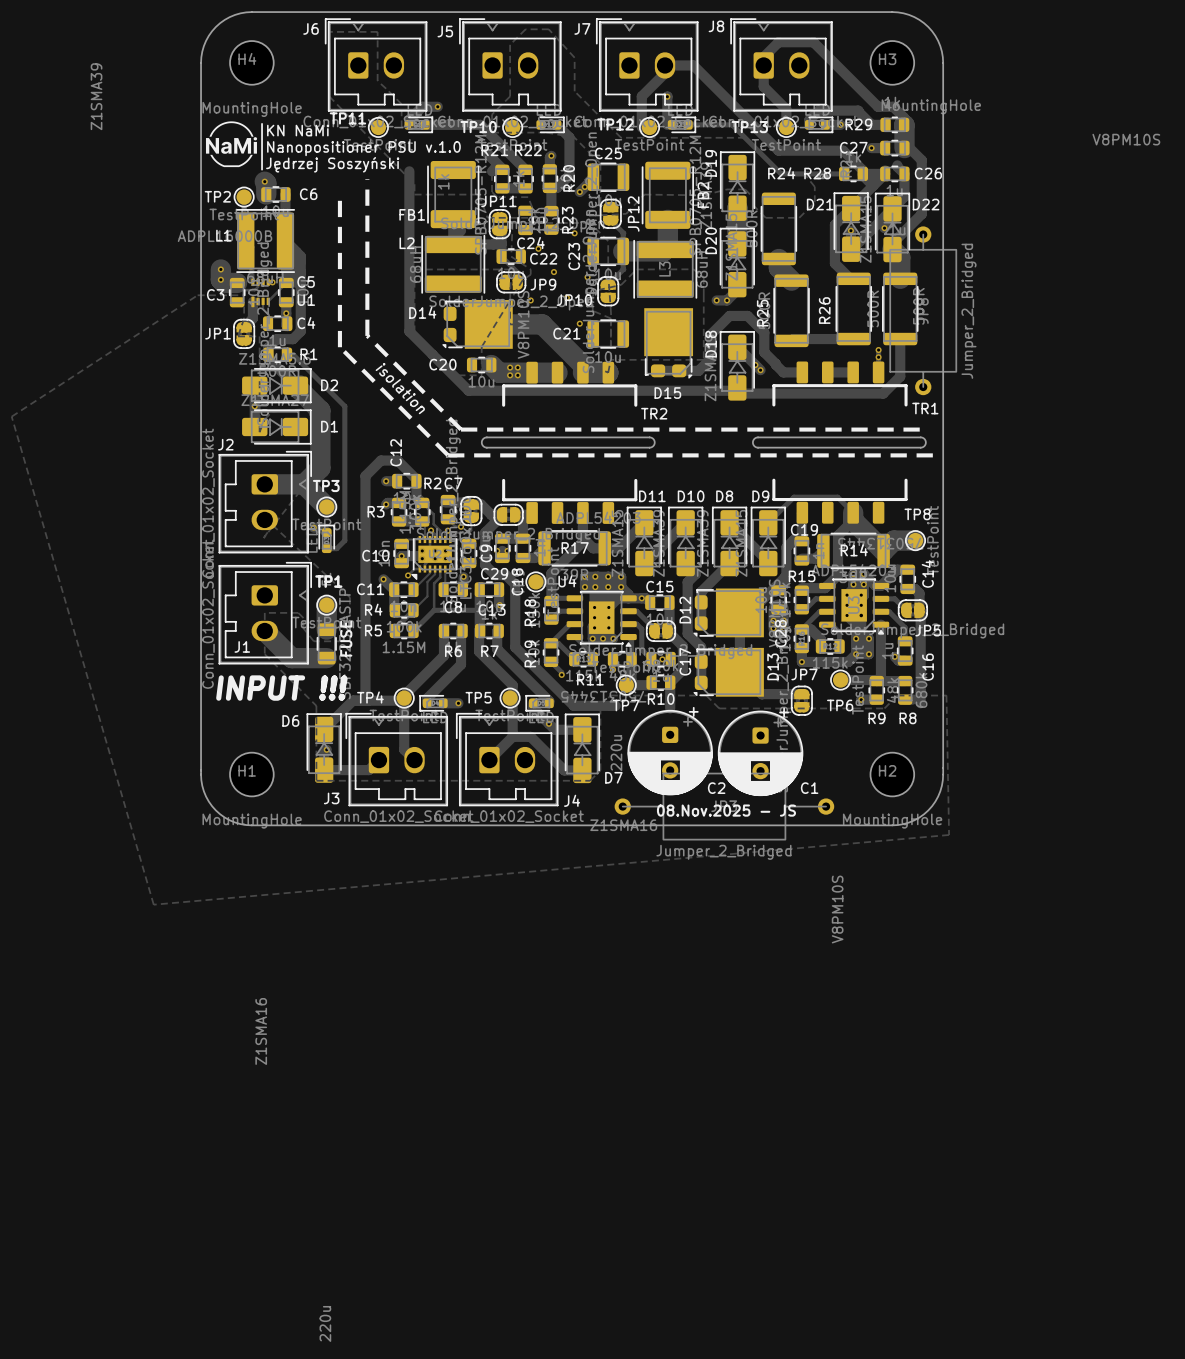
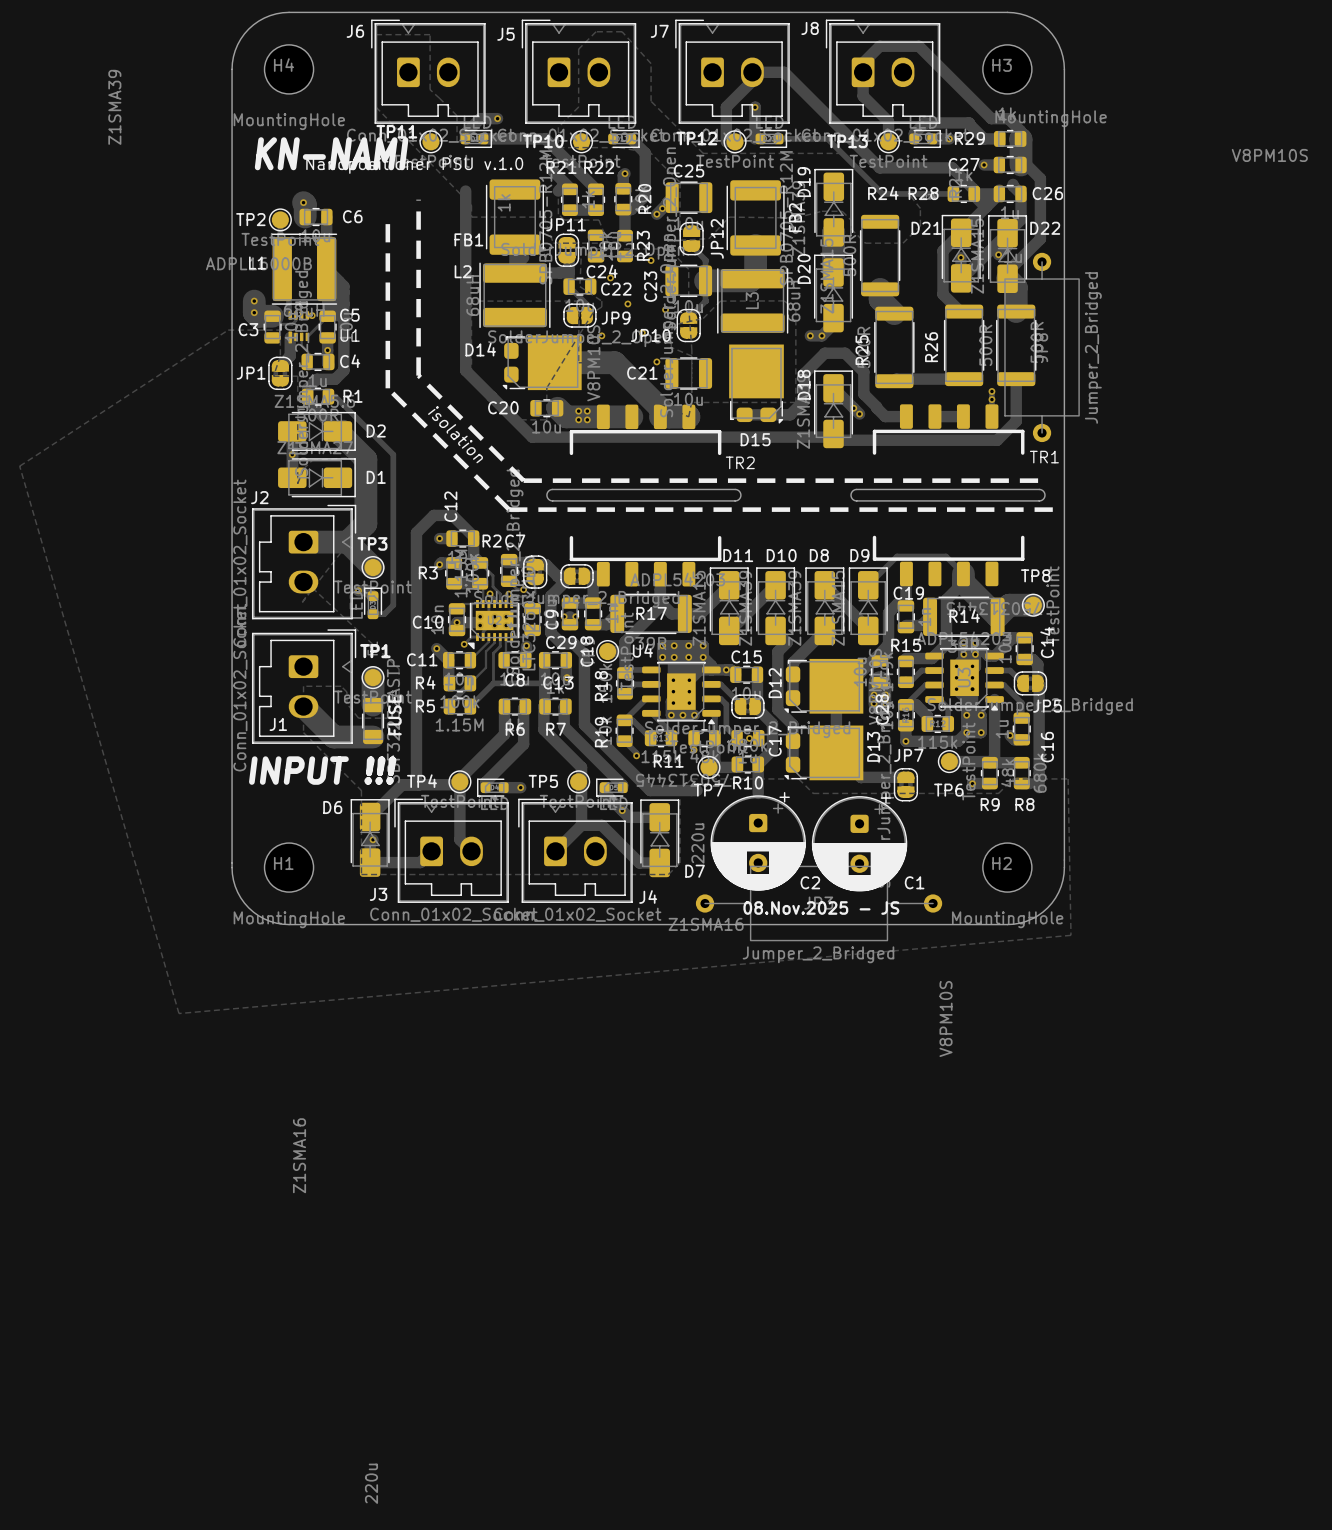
drawing: [205, 121, 258, 168] -> none
line: (262, 123) (262, 169) -> none
text: KN NaMi (298, 130) -> none
text: none -> KN-NAMI (331, 153)
text: Jędrzej Soszyński (332, 164) -> none

